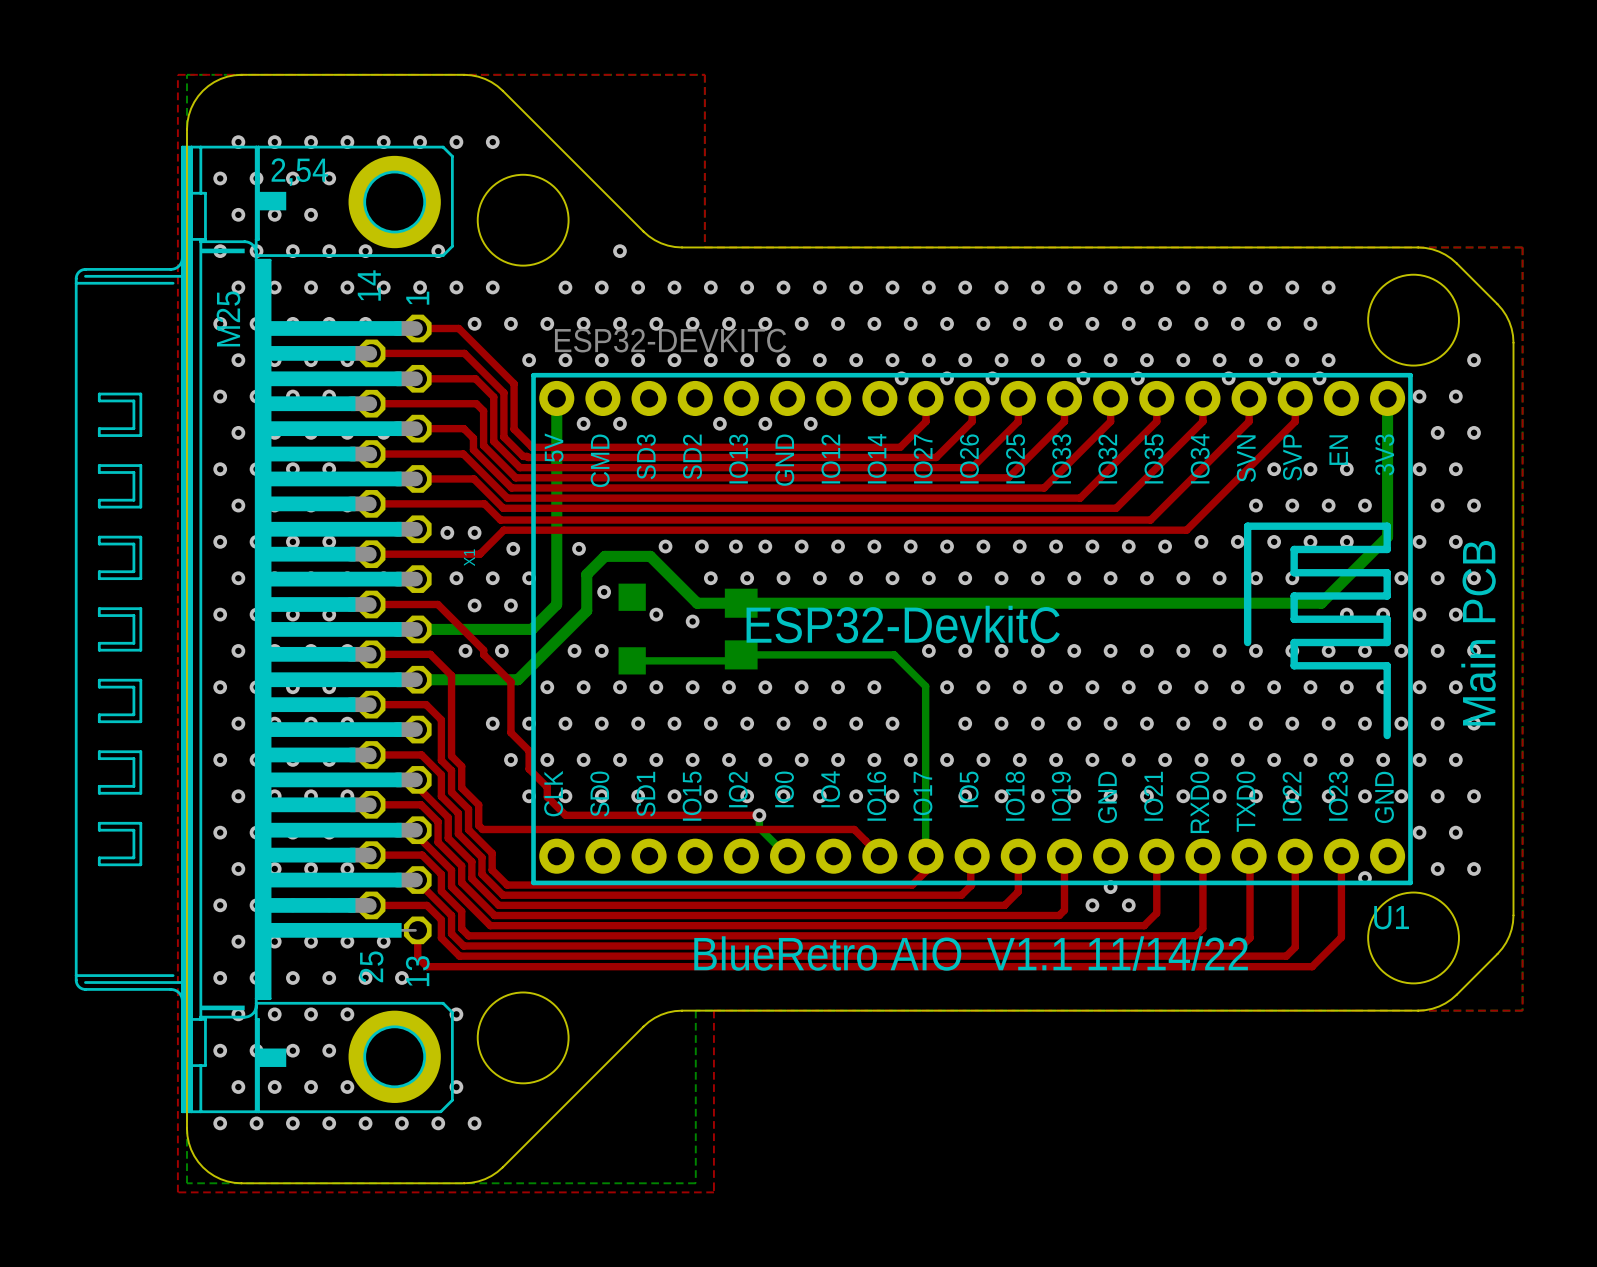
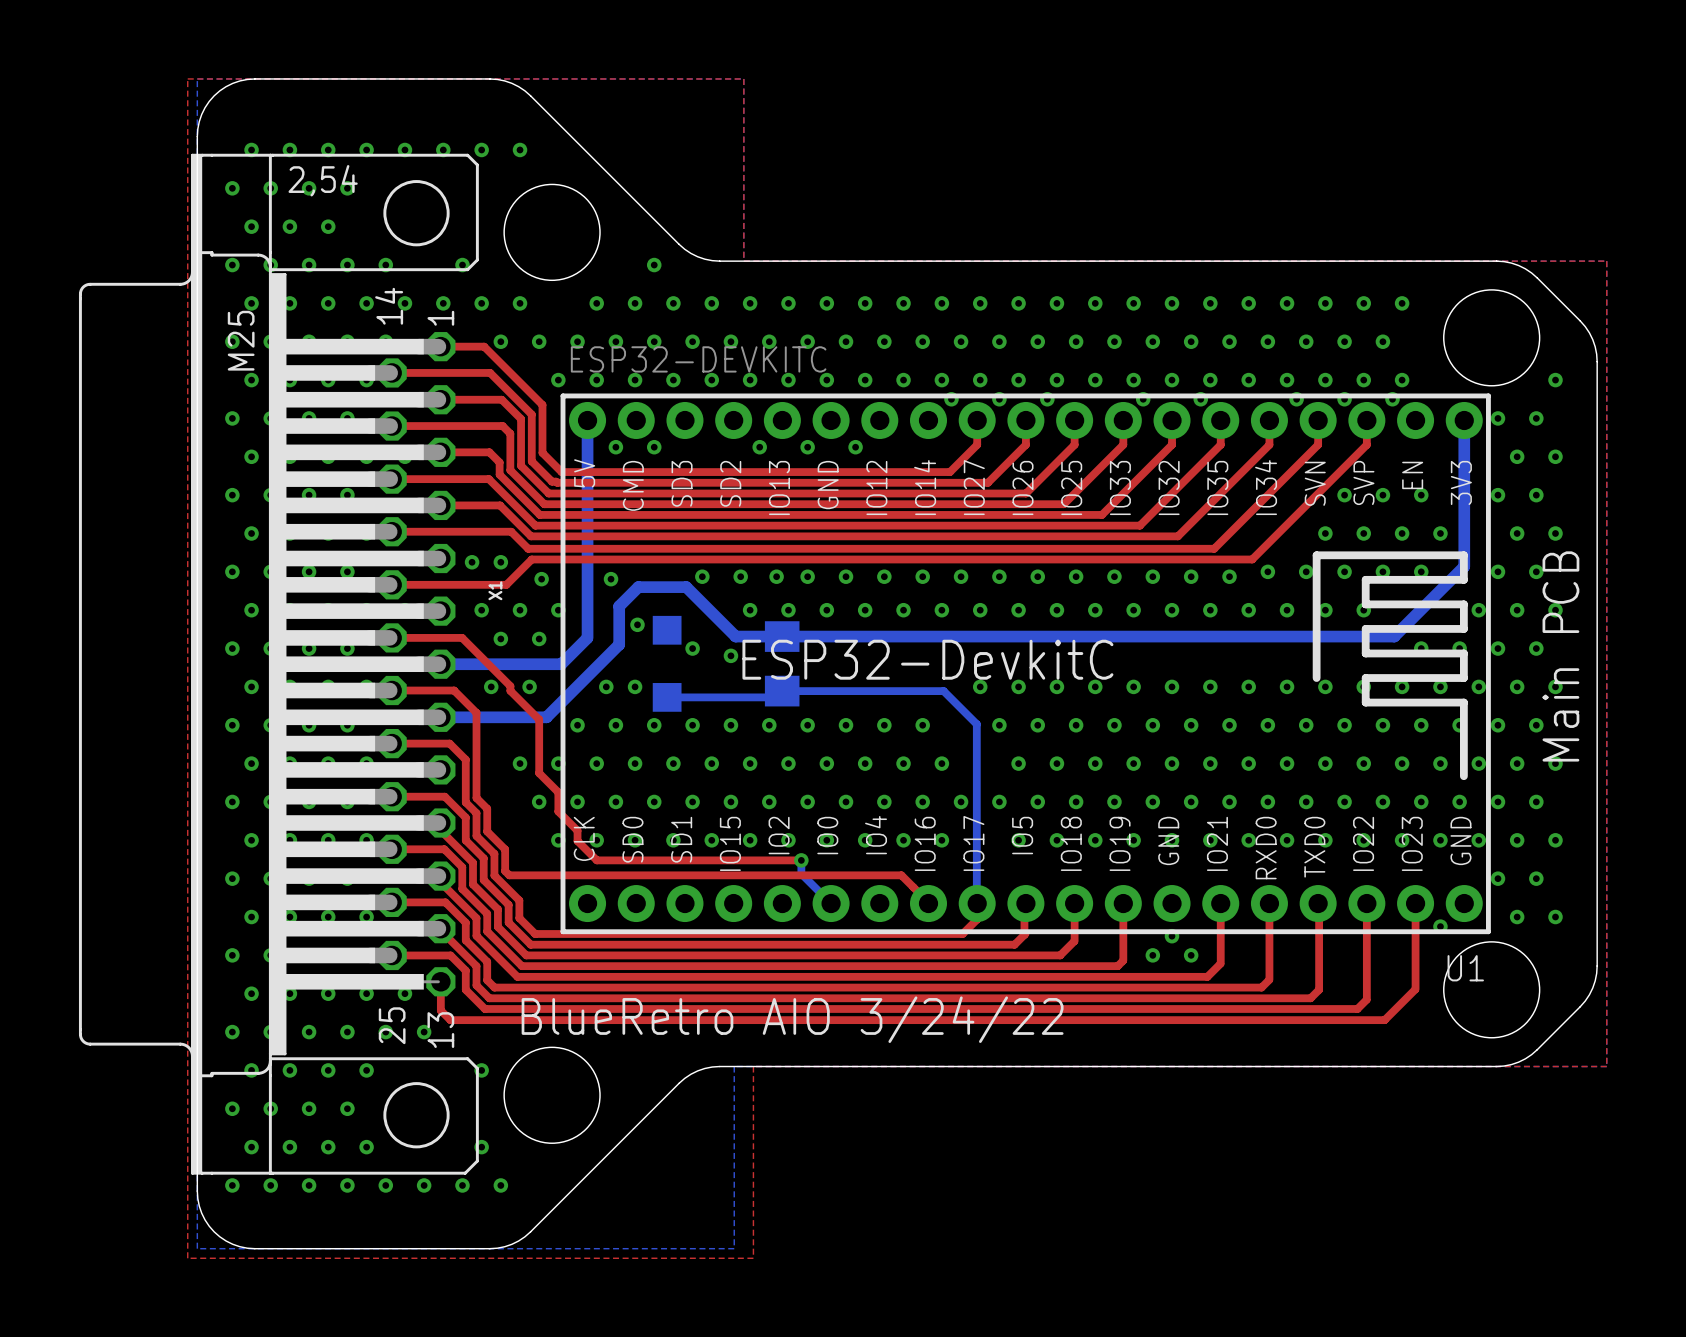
X1 footprint: [74, 145, 454, 1114] -> [78, 153, 479, 1175]
text: BlueRetro AIO V1.1 11/14/22 (971, 953) -> BlueRetro AIO 3/24/22 (792, 1019)

